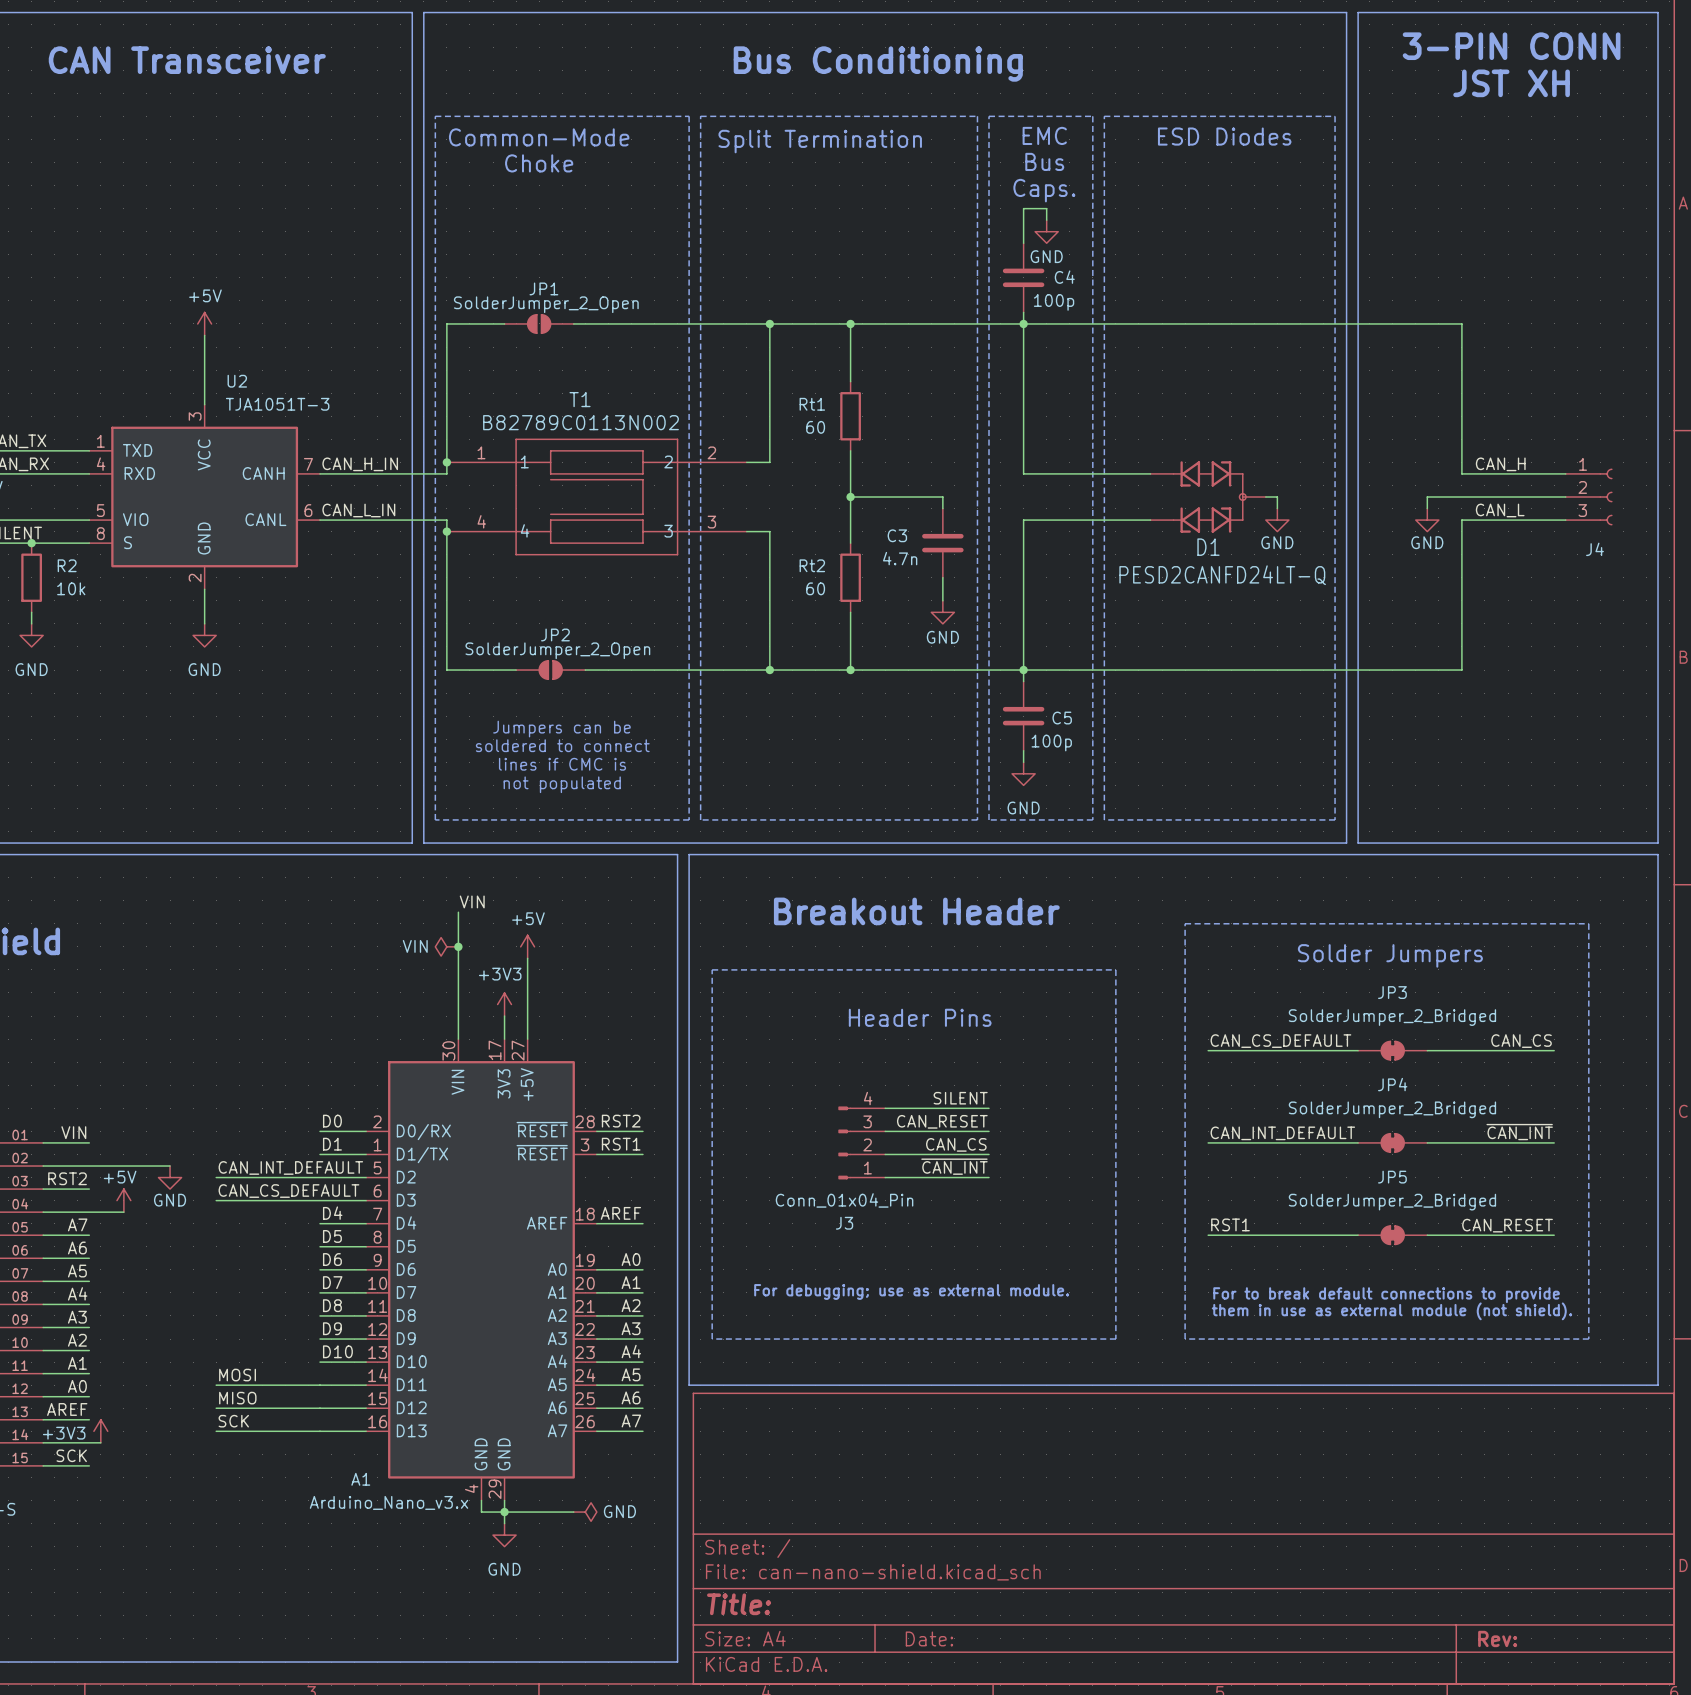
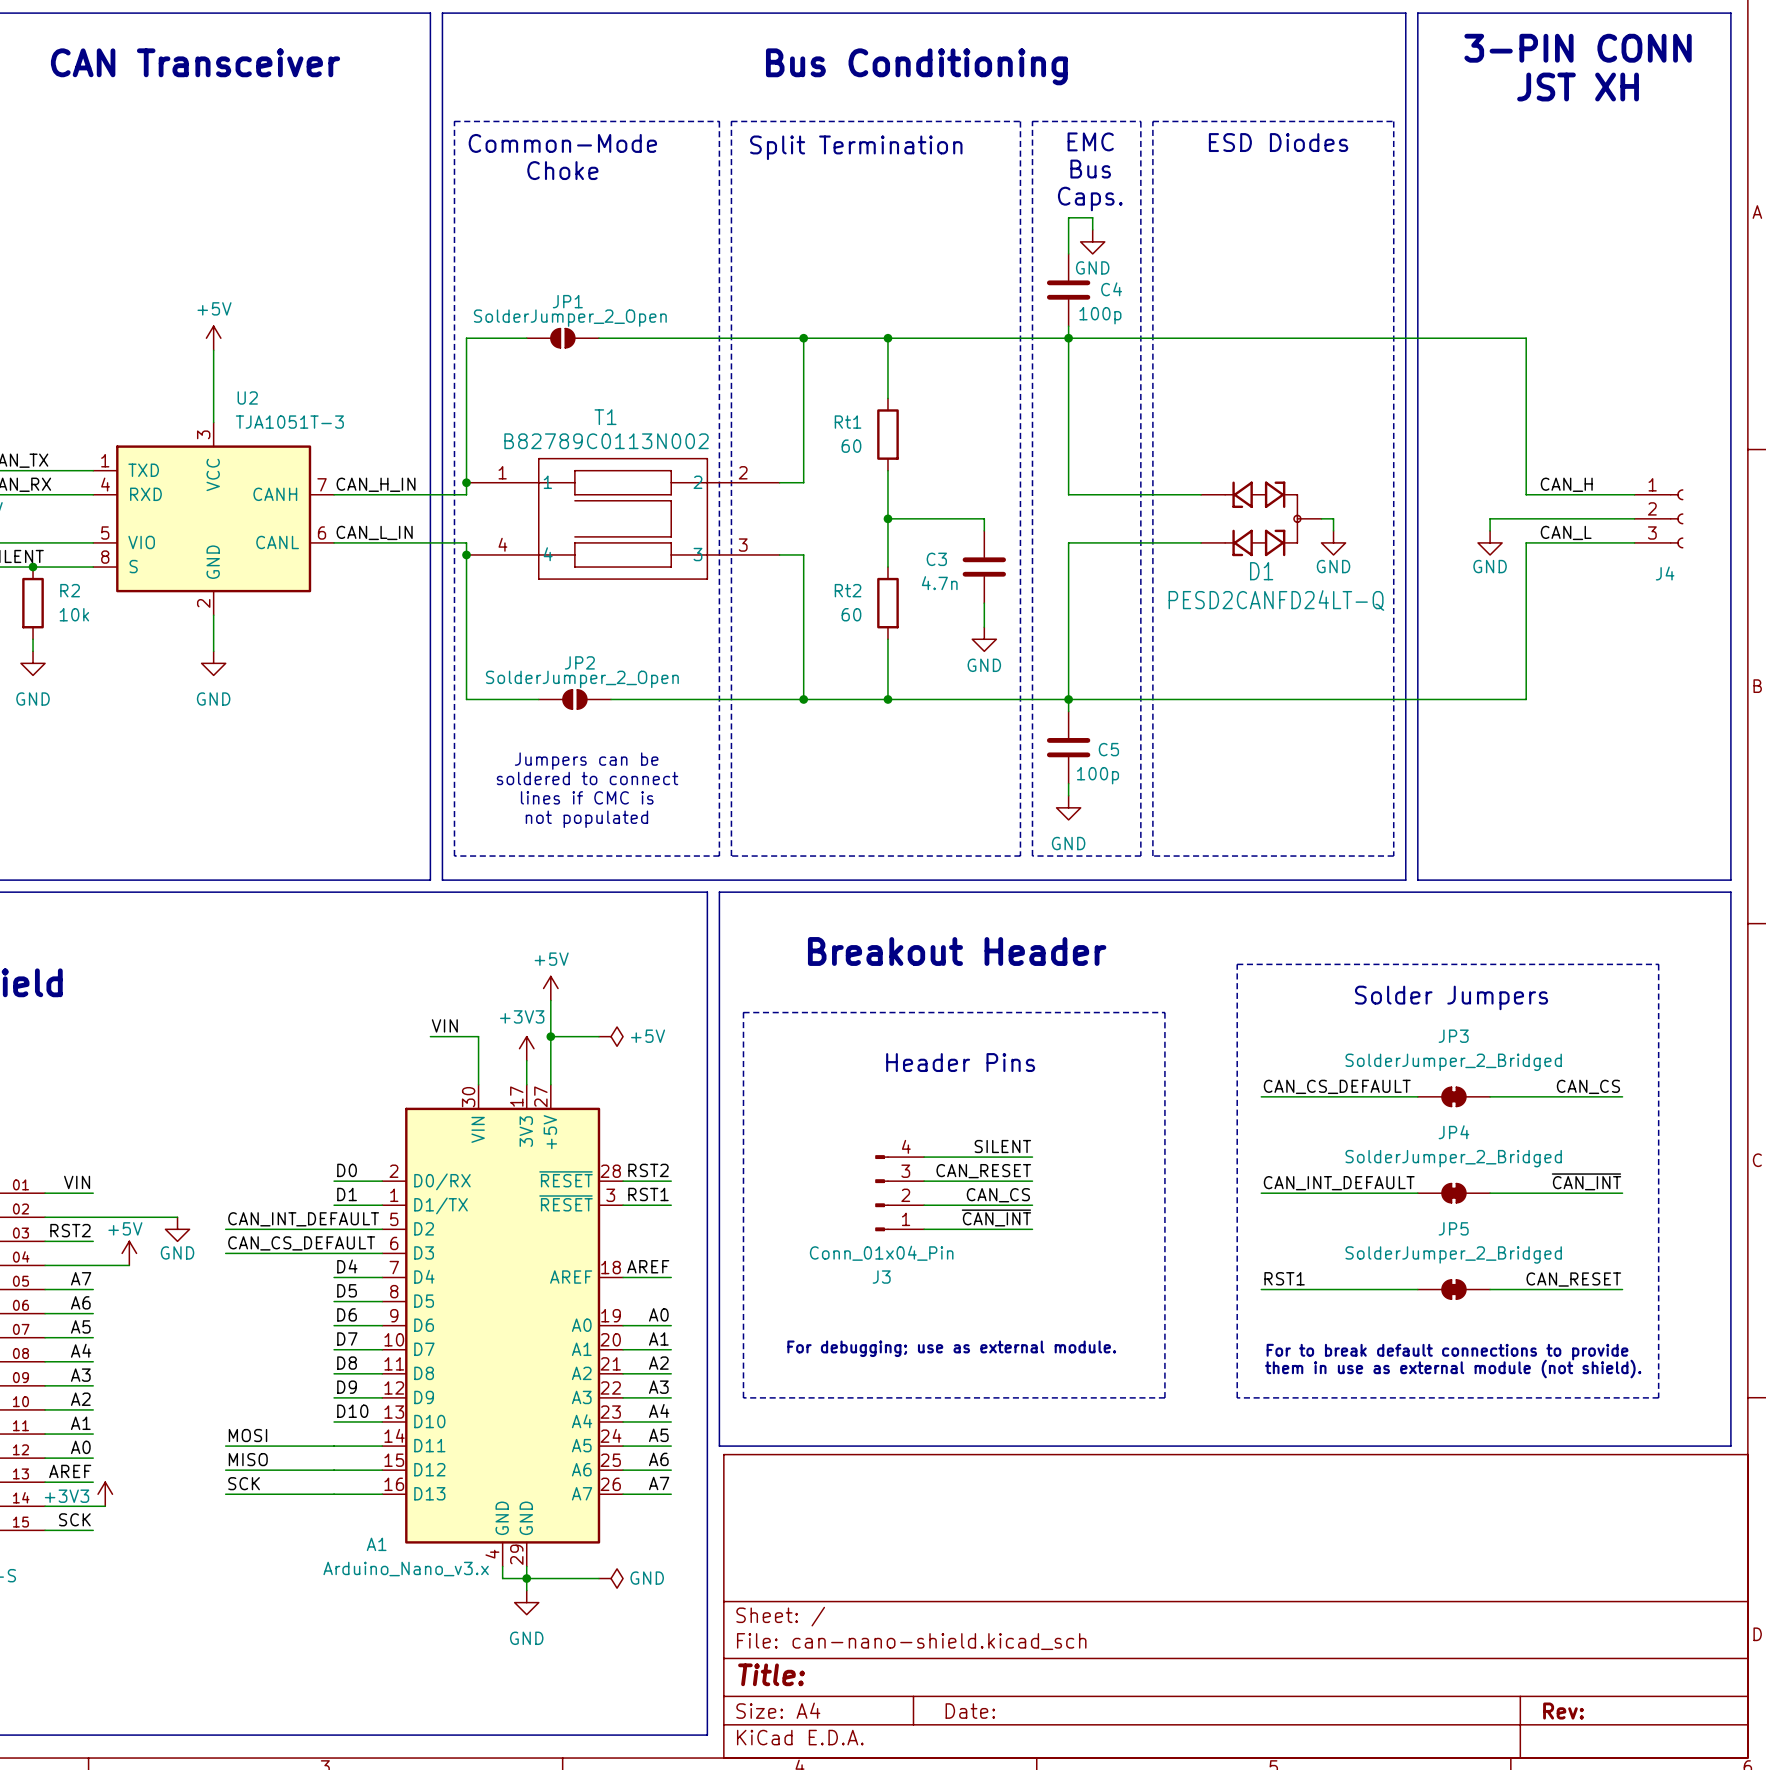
label position: VIN (472, 901) -> VIN (444, 1025)
wire: (458, 912) (458, 992) -> (430, 1036) (478, 1036)
power symbol: VIN (446, 946) -> none
junction: (458, 946) -> none
wire: none -> (550, 1036) (598, 1036)
junction: none -> (550, 1036)
power symbol: none -> +5V (611, 1036)

